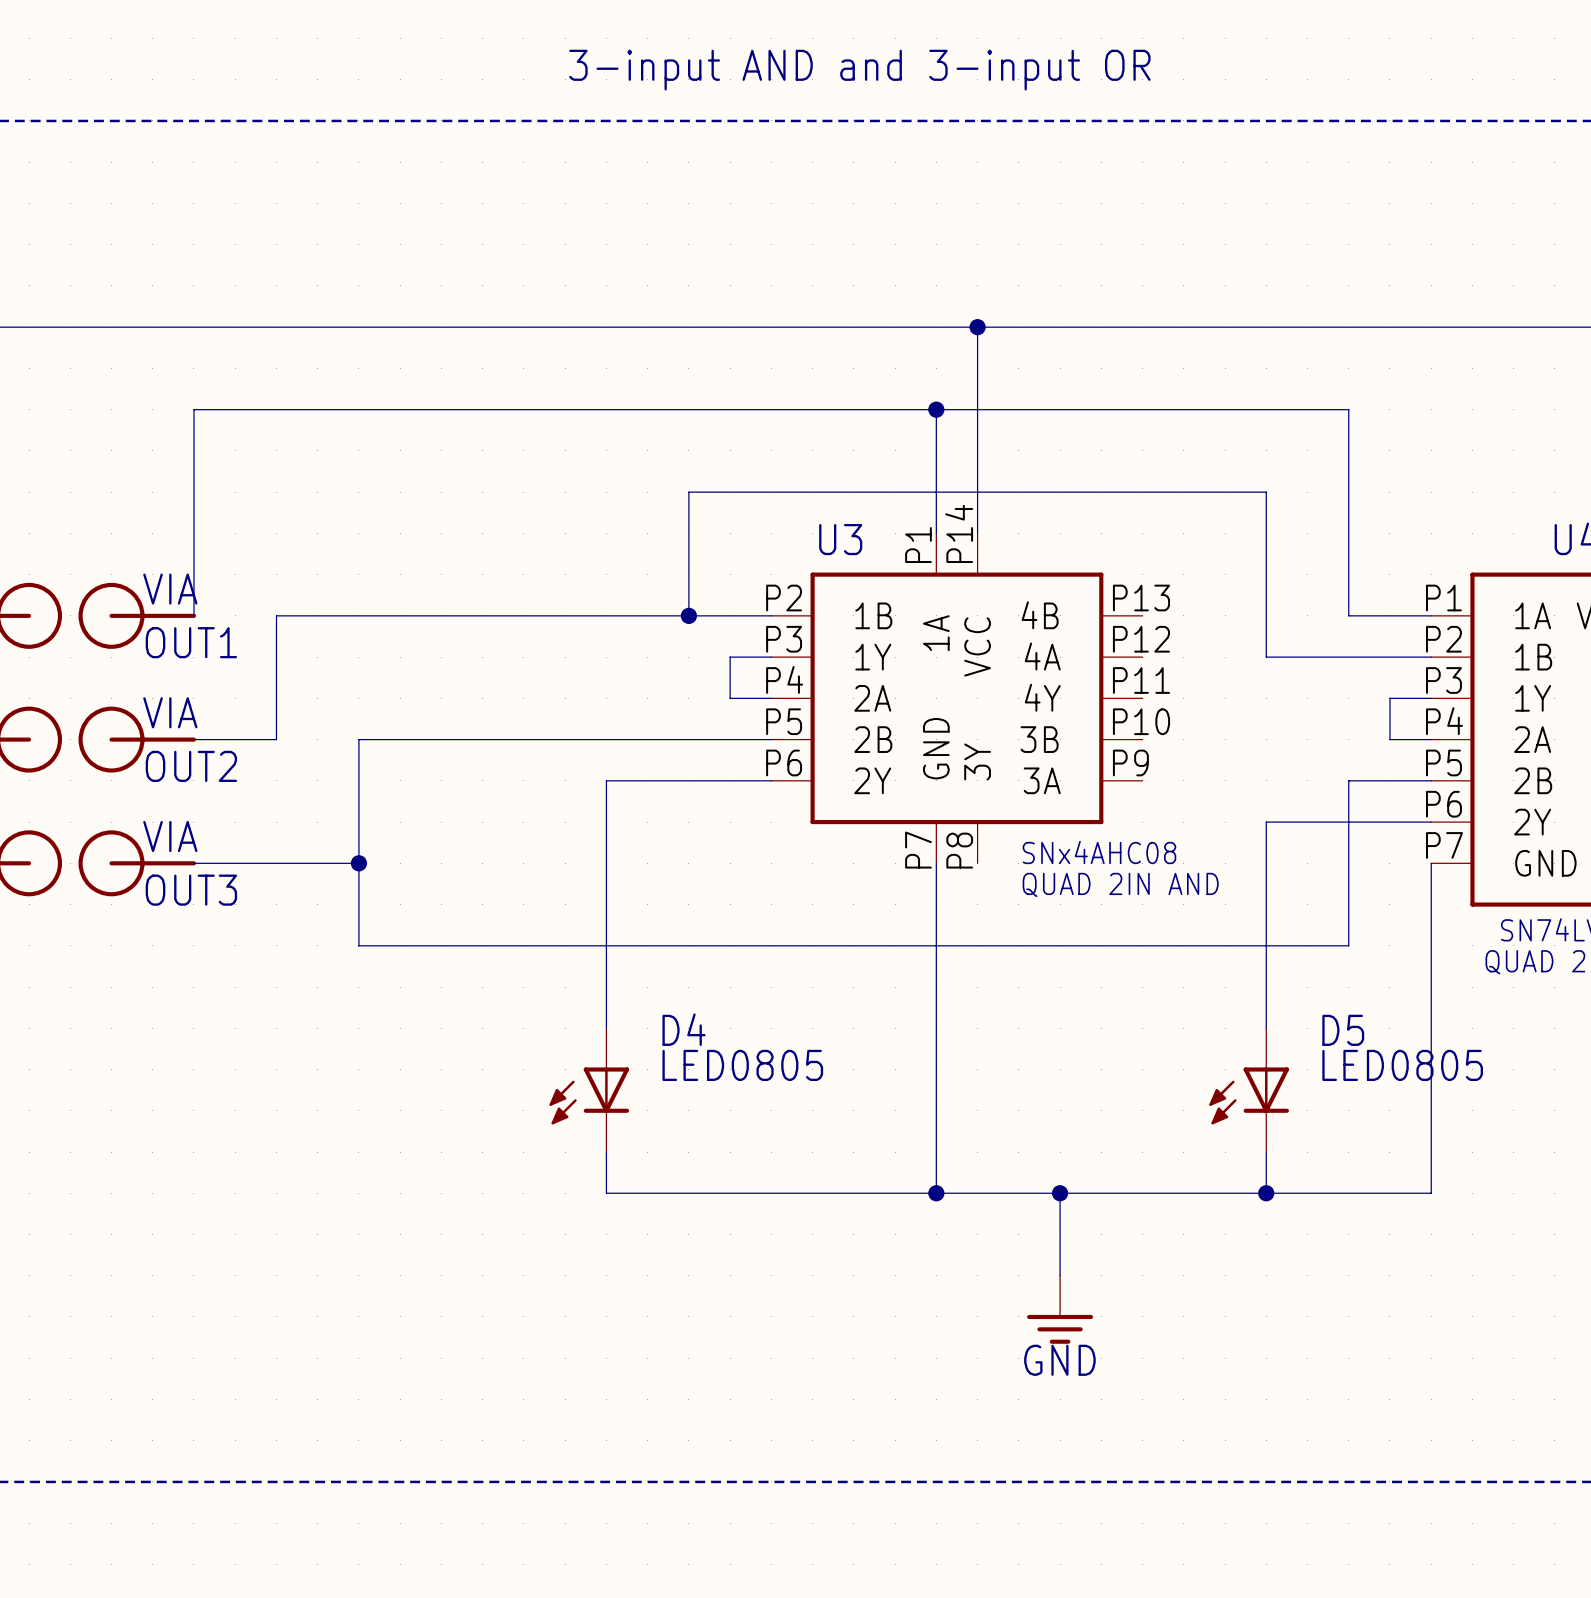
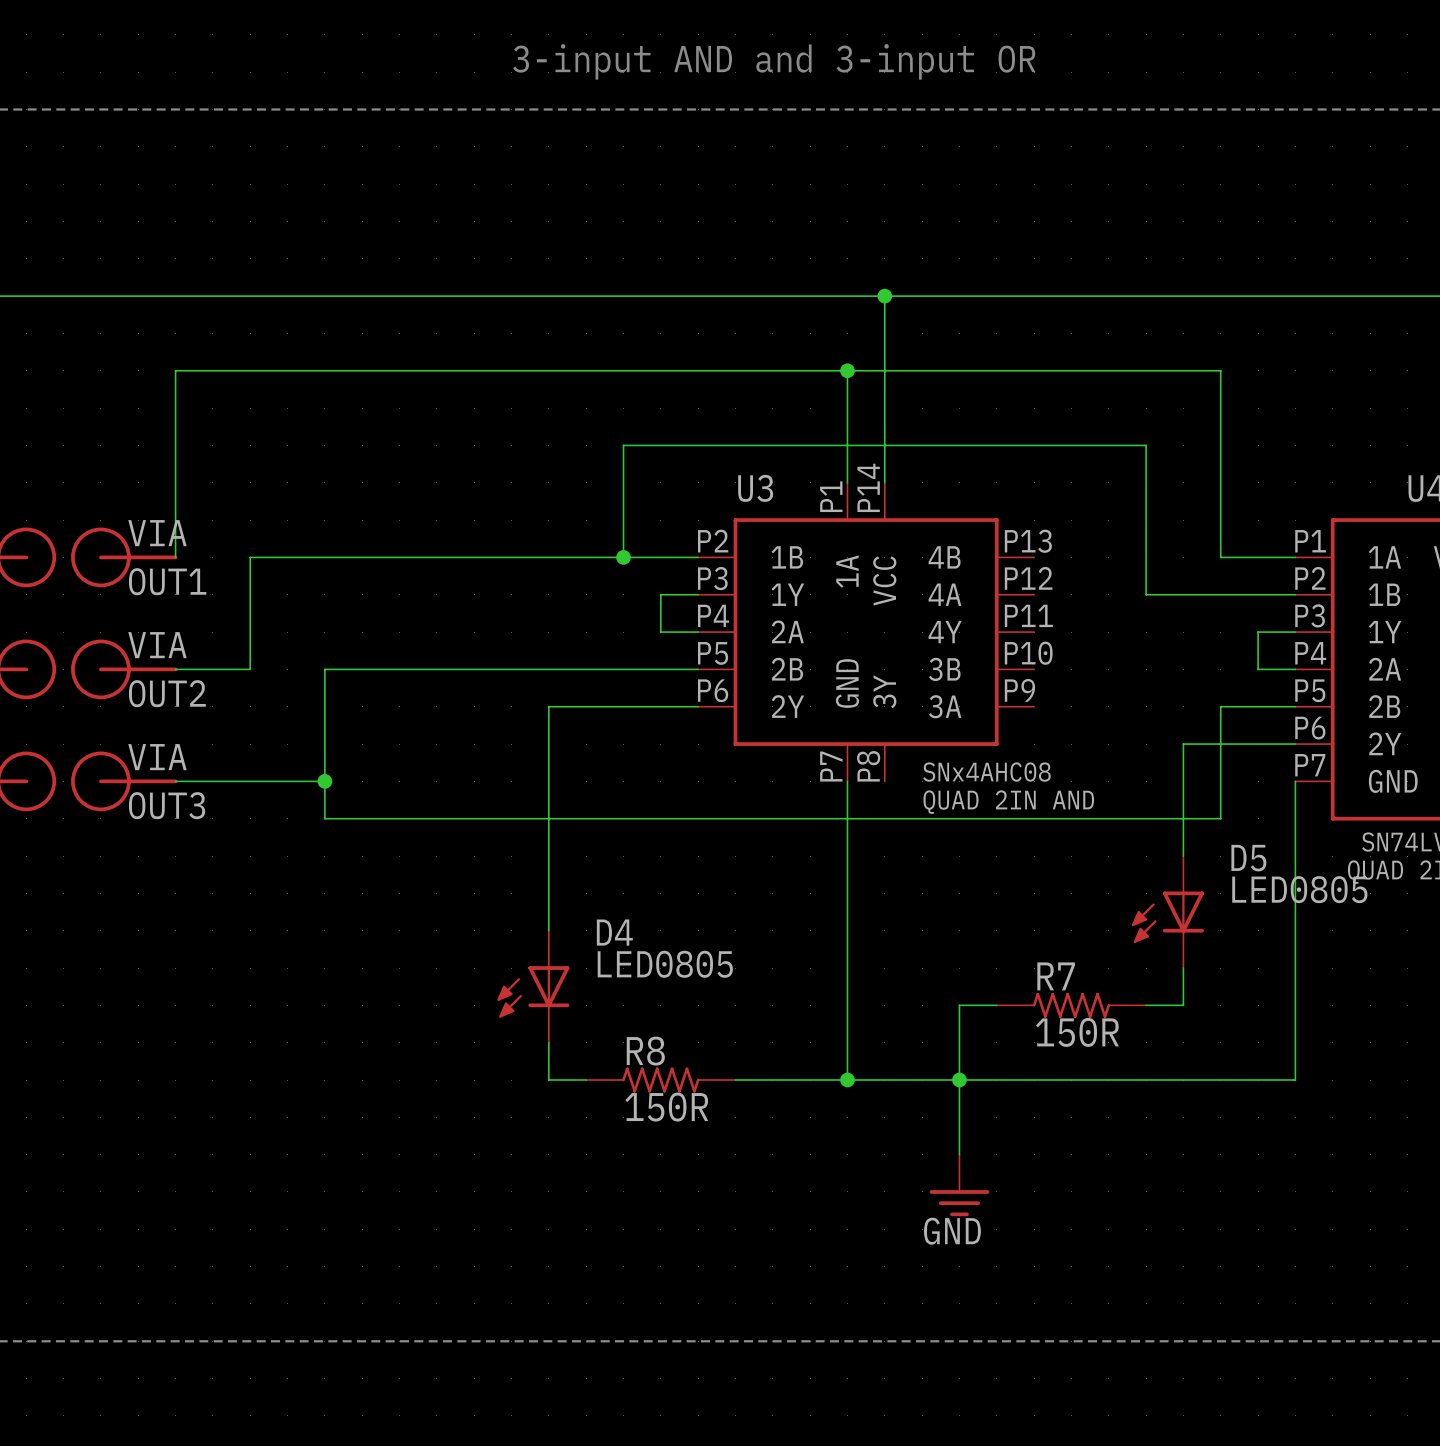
wire: (1307, 822) (1266, 822) (1266, 1028) -> (1183, 744) (1183, 856)
wire: (358, 904) (358, 945) (1348, 945) (1348, 904) -> (324, 818) (1220, 818)
wire: none -> (1183, 968) (1183, 1005) (1146, 1005)
D5 position: (1249, 1090) -> (1167, 912)
wire: none -> (996, 1005) (959, 1005) (959, 1080)
R7: none -> 150R (1071, 1005)
wire: (1266, 1152) (1266, 1193) -> none
R8: none -> 150R (660, 1080)
junction: (1266, 1193) -> none

